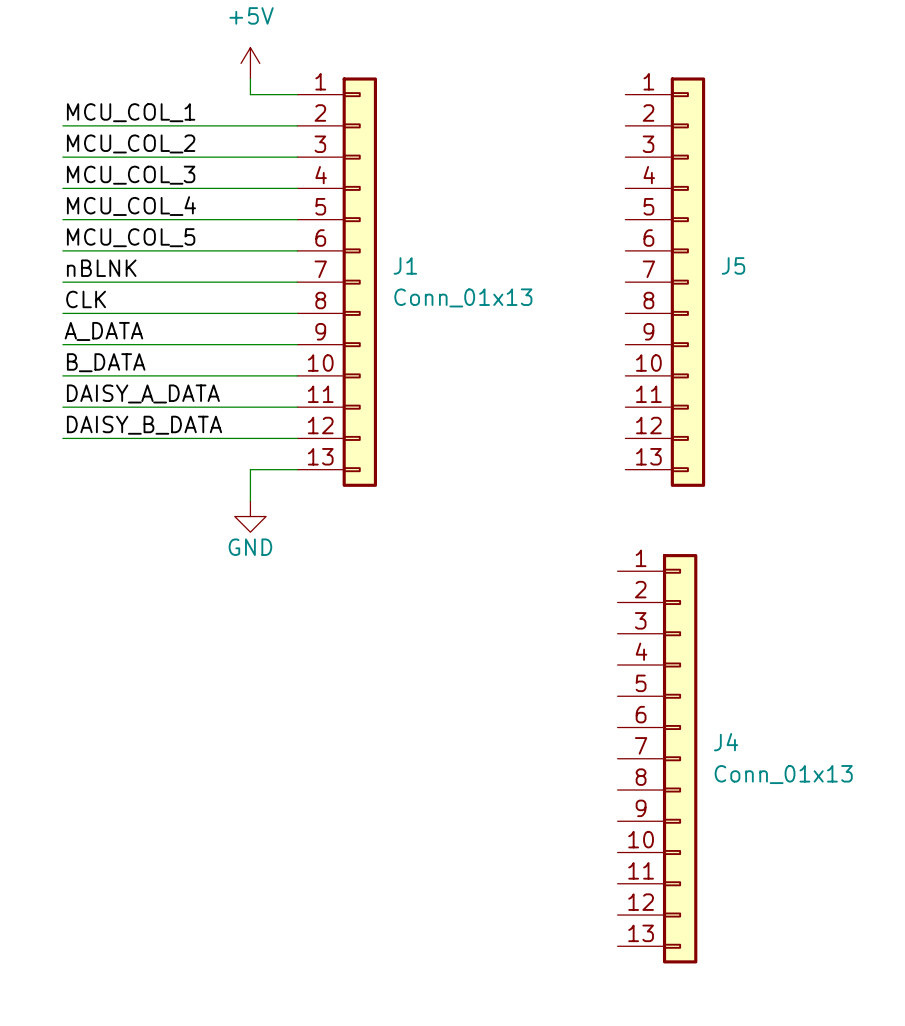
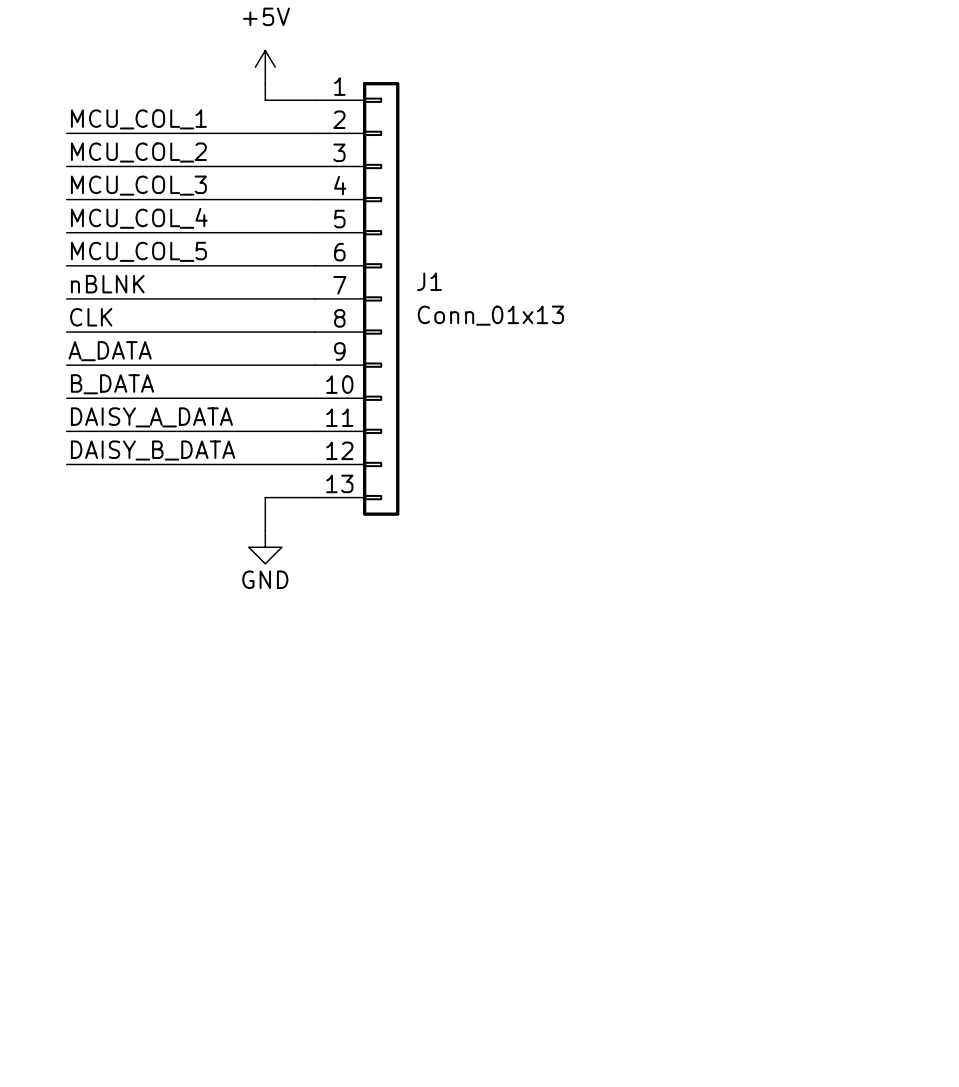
J5: (665, 282) -> none
J4: Conn_01x13 (657, 758) -> none

